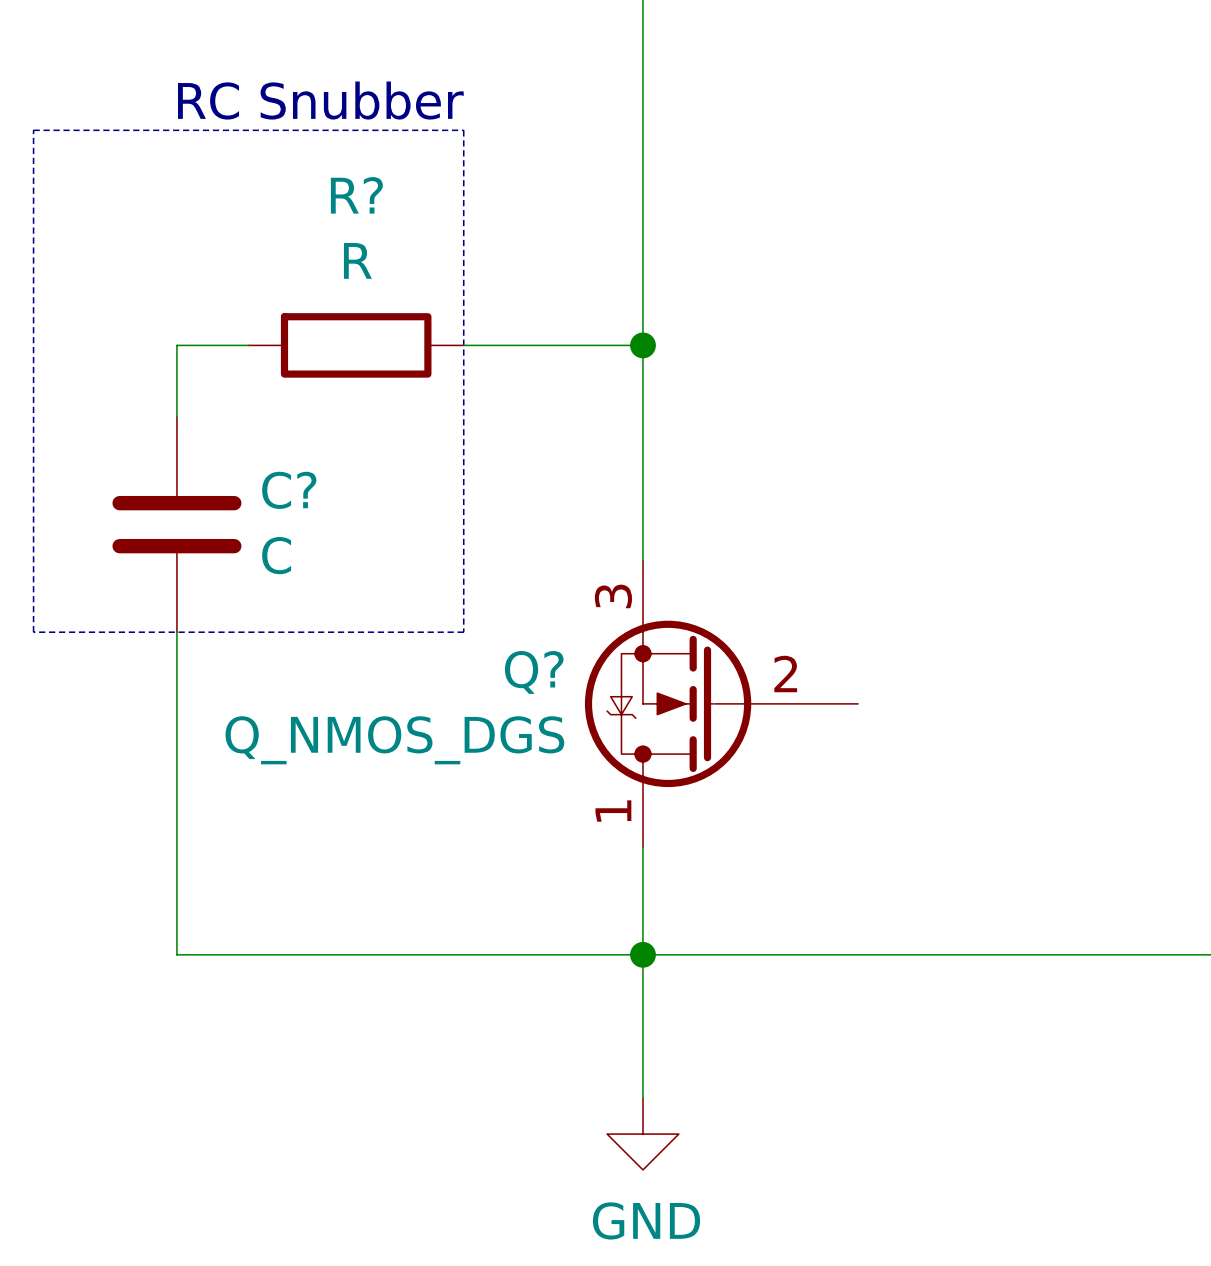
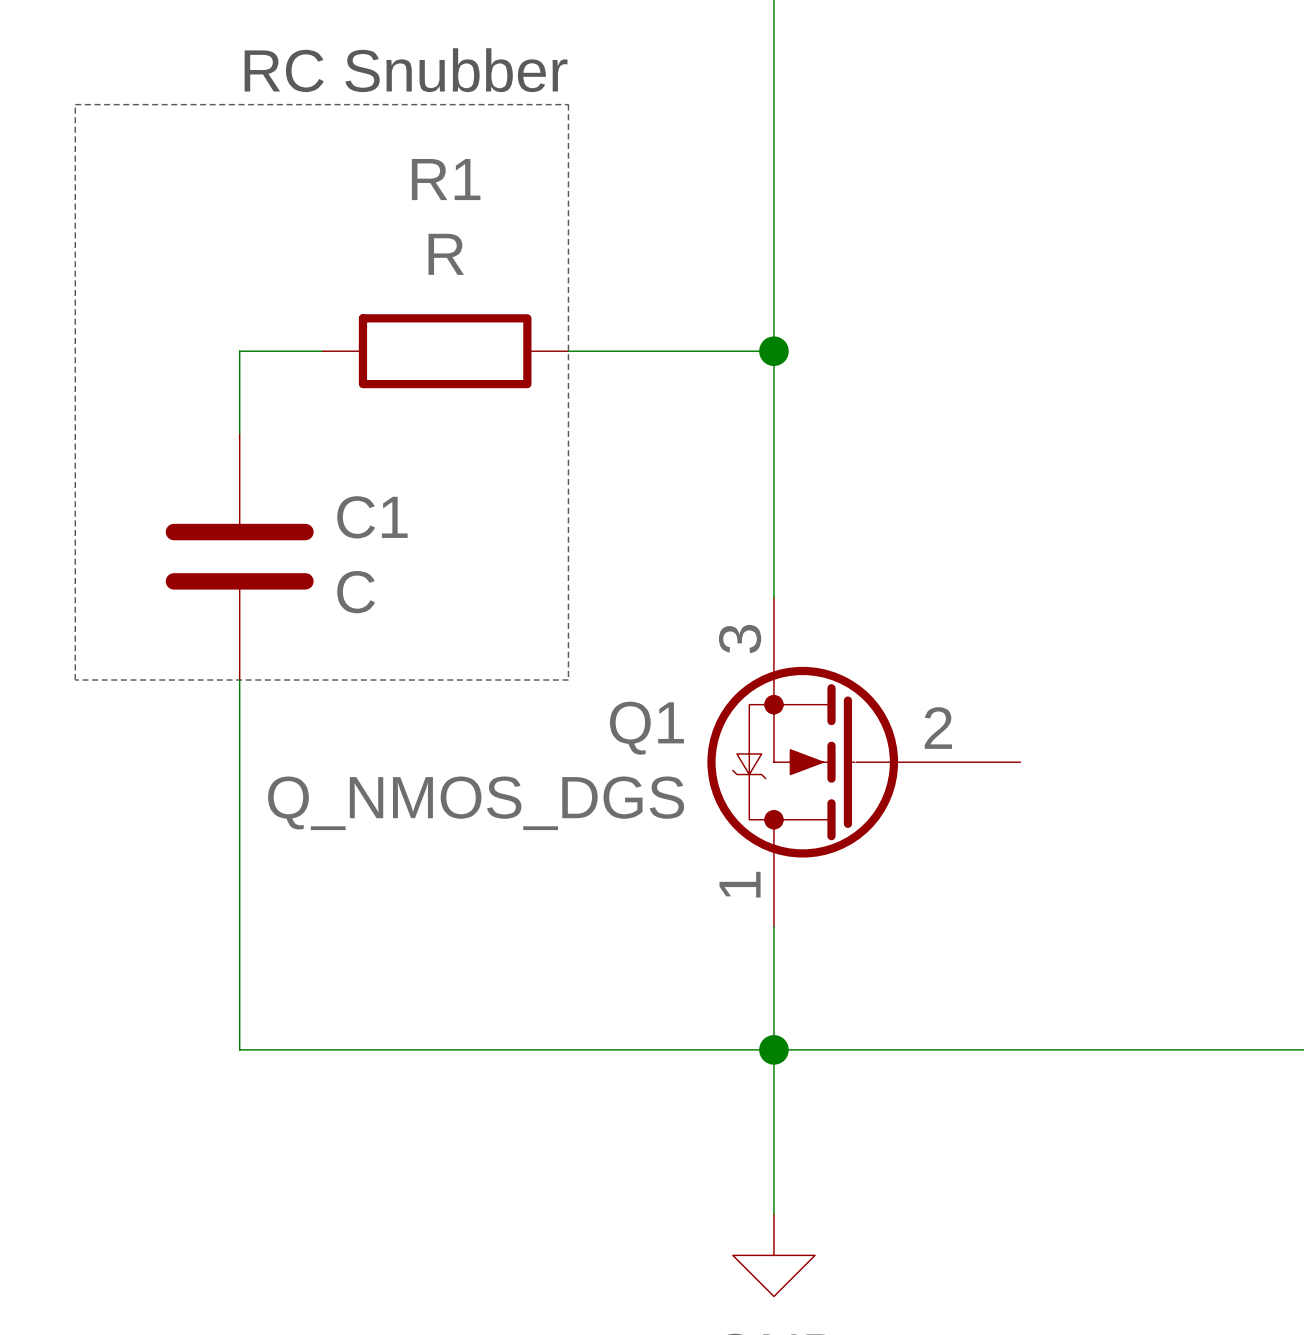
R? name: R? (356, 195) -> R1 (446, 179)
C? name: C? (289, 490) -> C1 (372, 517)
Q? name: Q? (534, 672) -> Q1 (646, 728)

